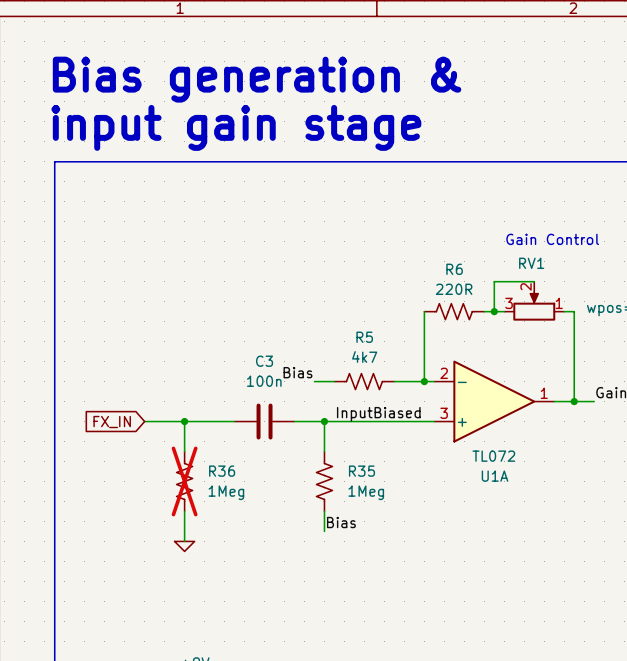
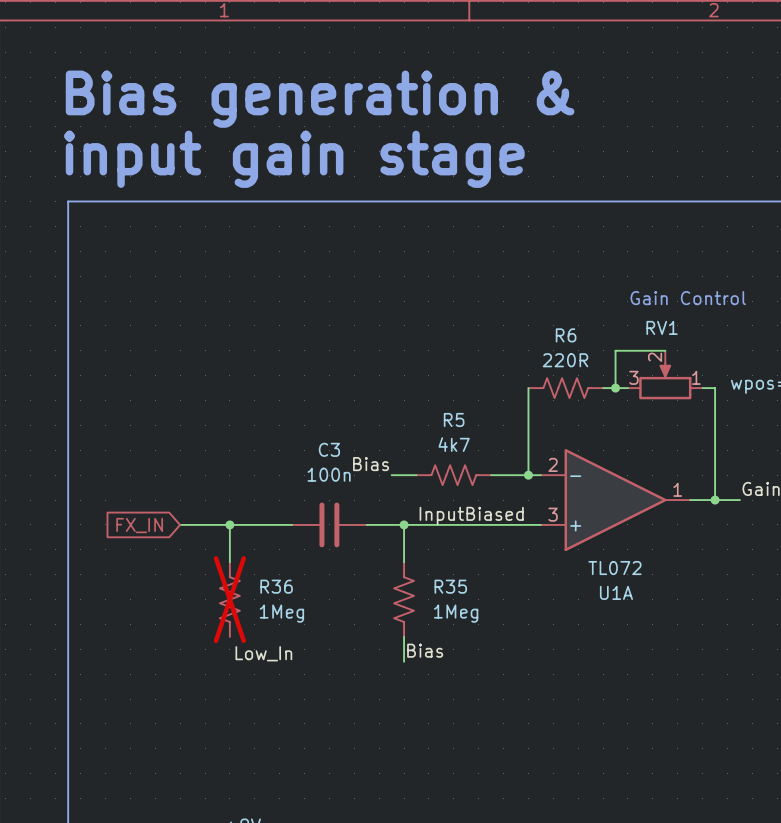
wire: (184, 511) (184, 541) -> none
label: none -> Low_In (263, 653)
power symbol: (184, 546) -> none

